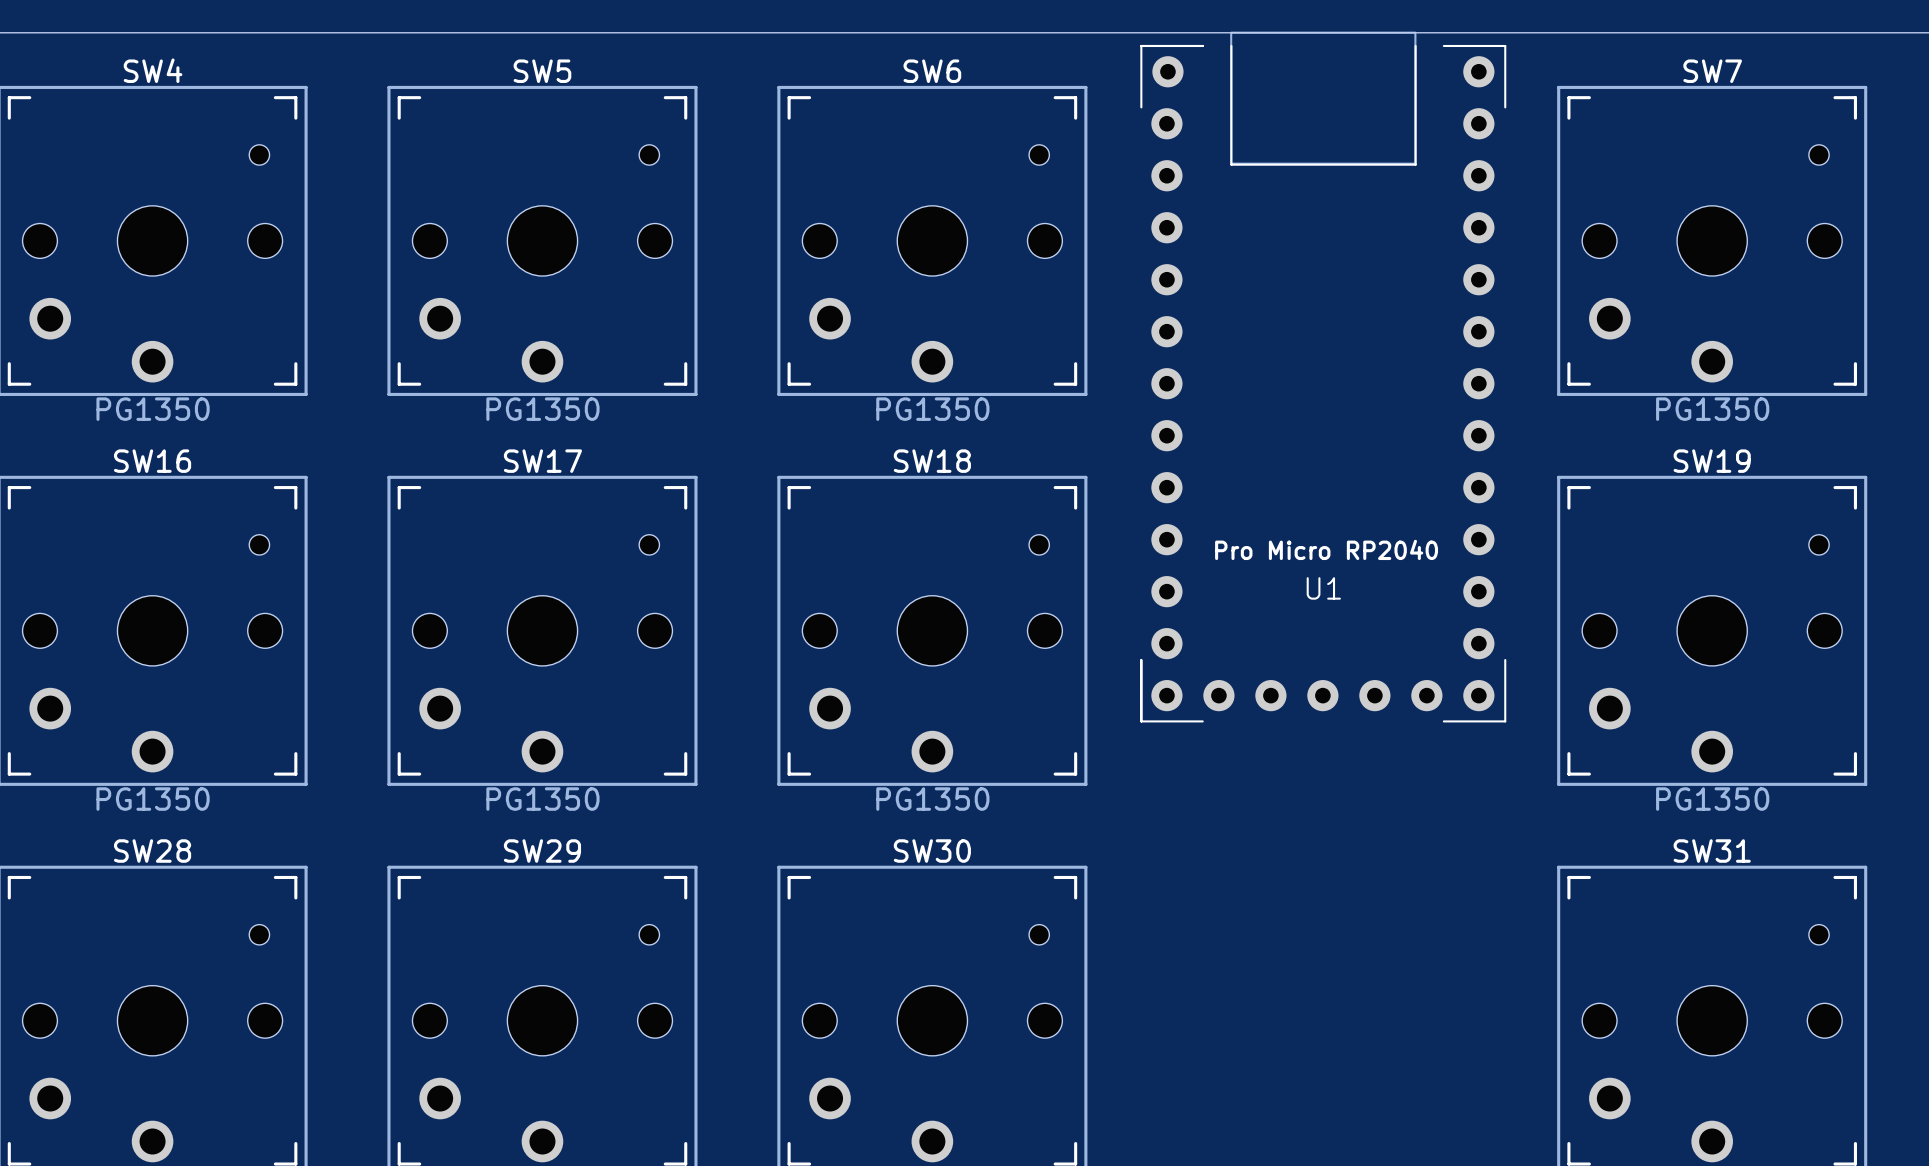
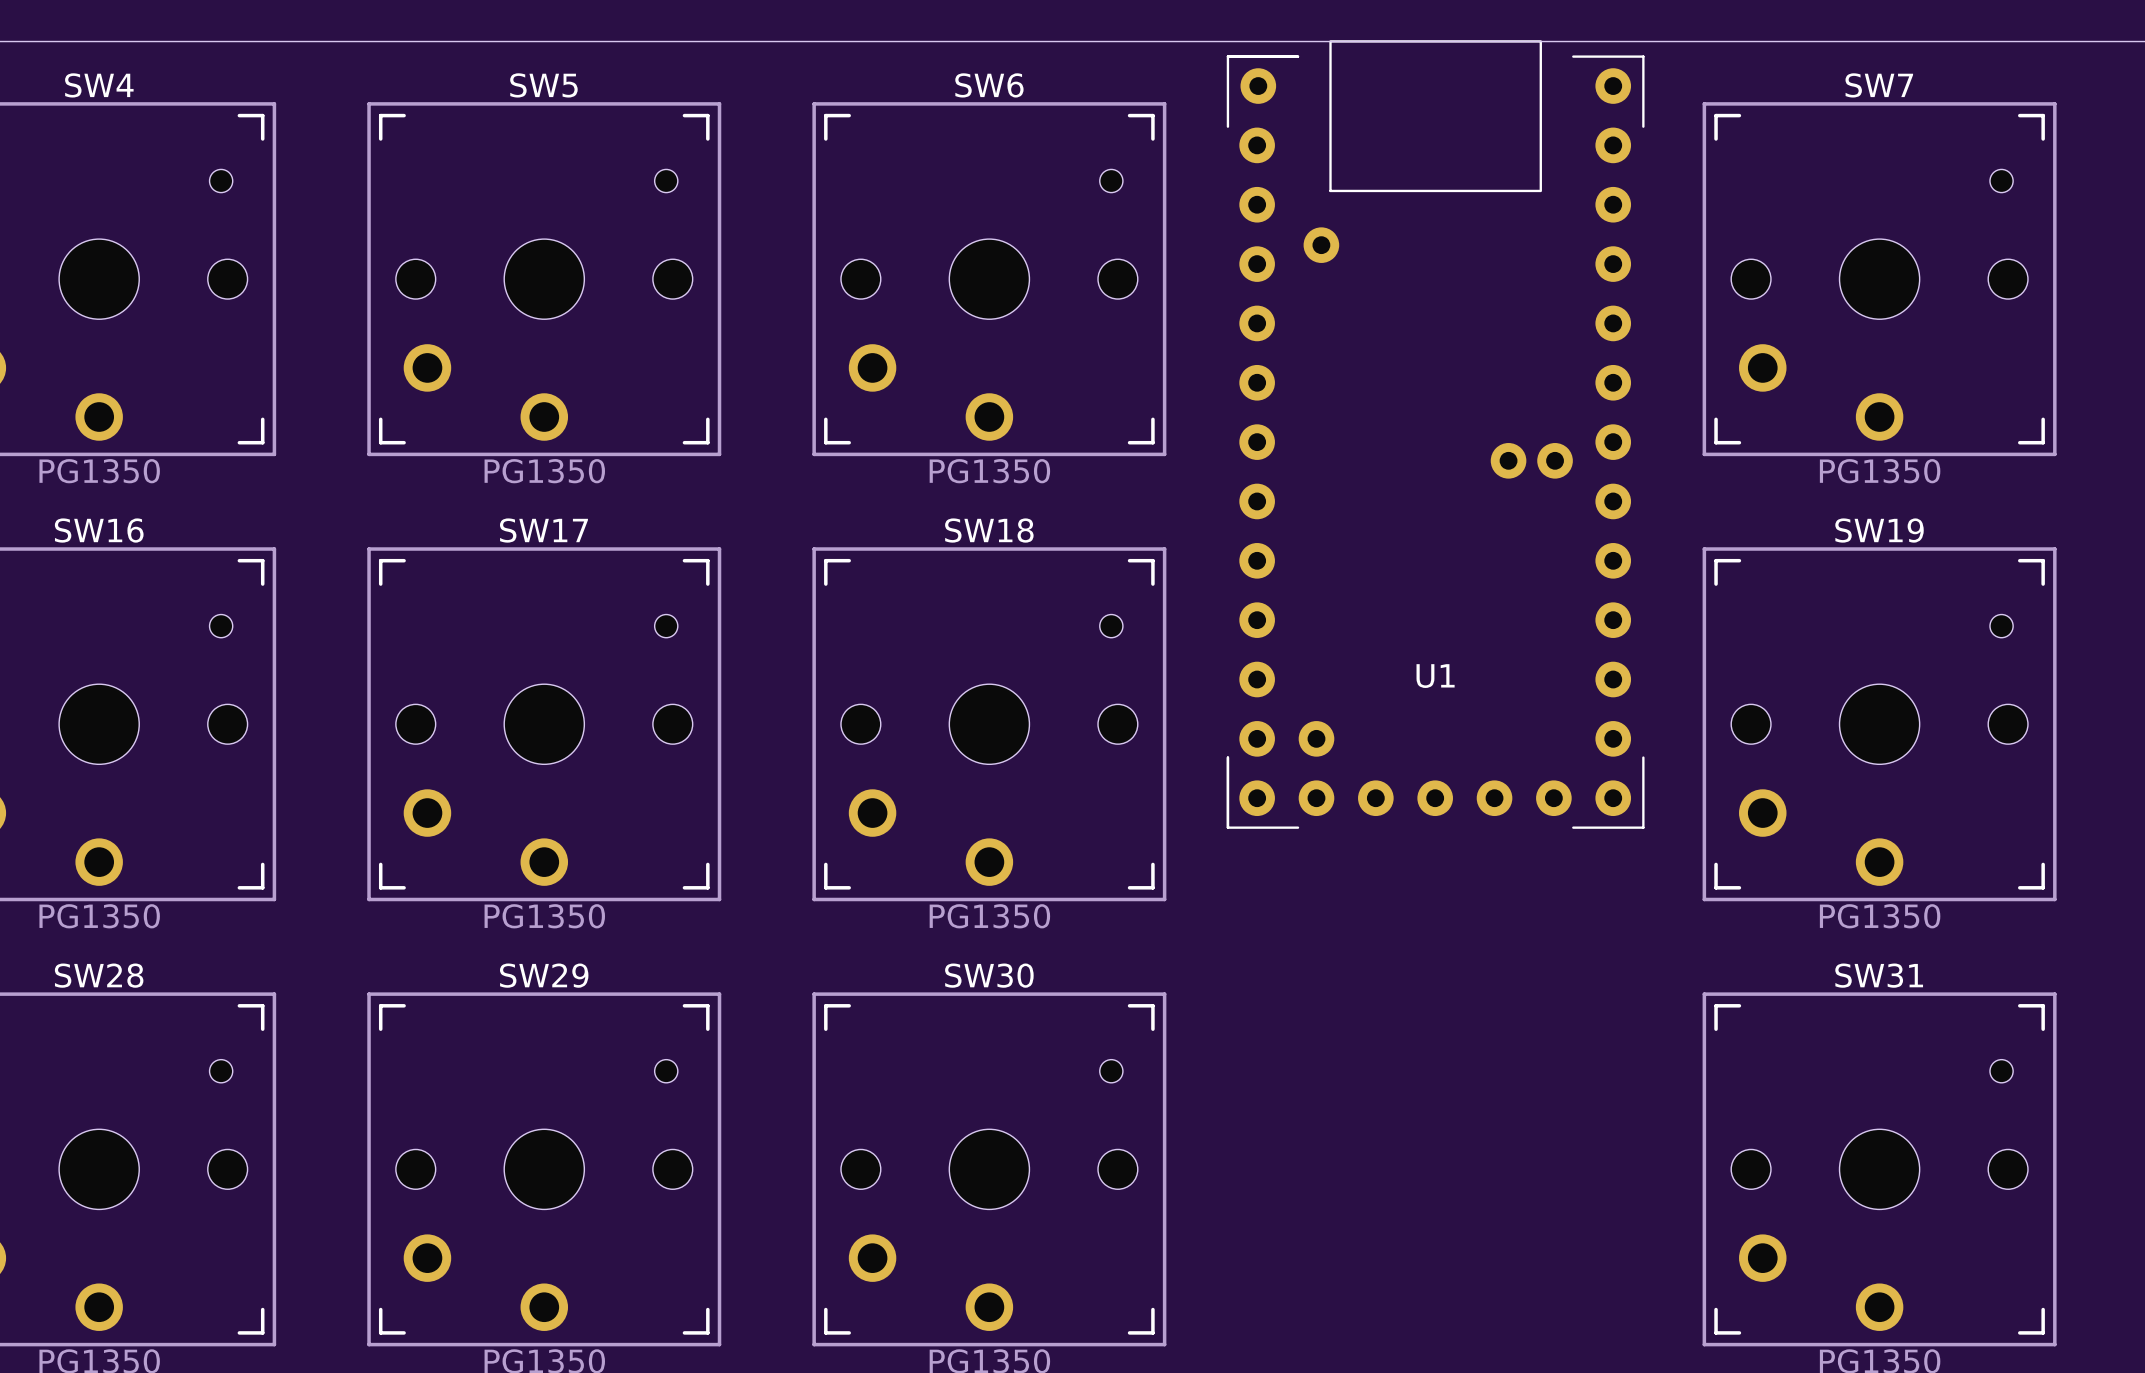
U1 footprint: [1140, 31, 1507, 723] -> [1226, 40, 1645, 829]
U1 value: Pro Micro RP2040 (1326, 549) -> none

